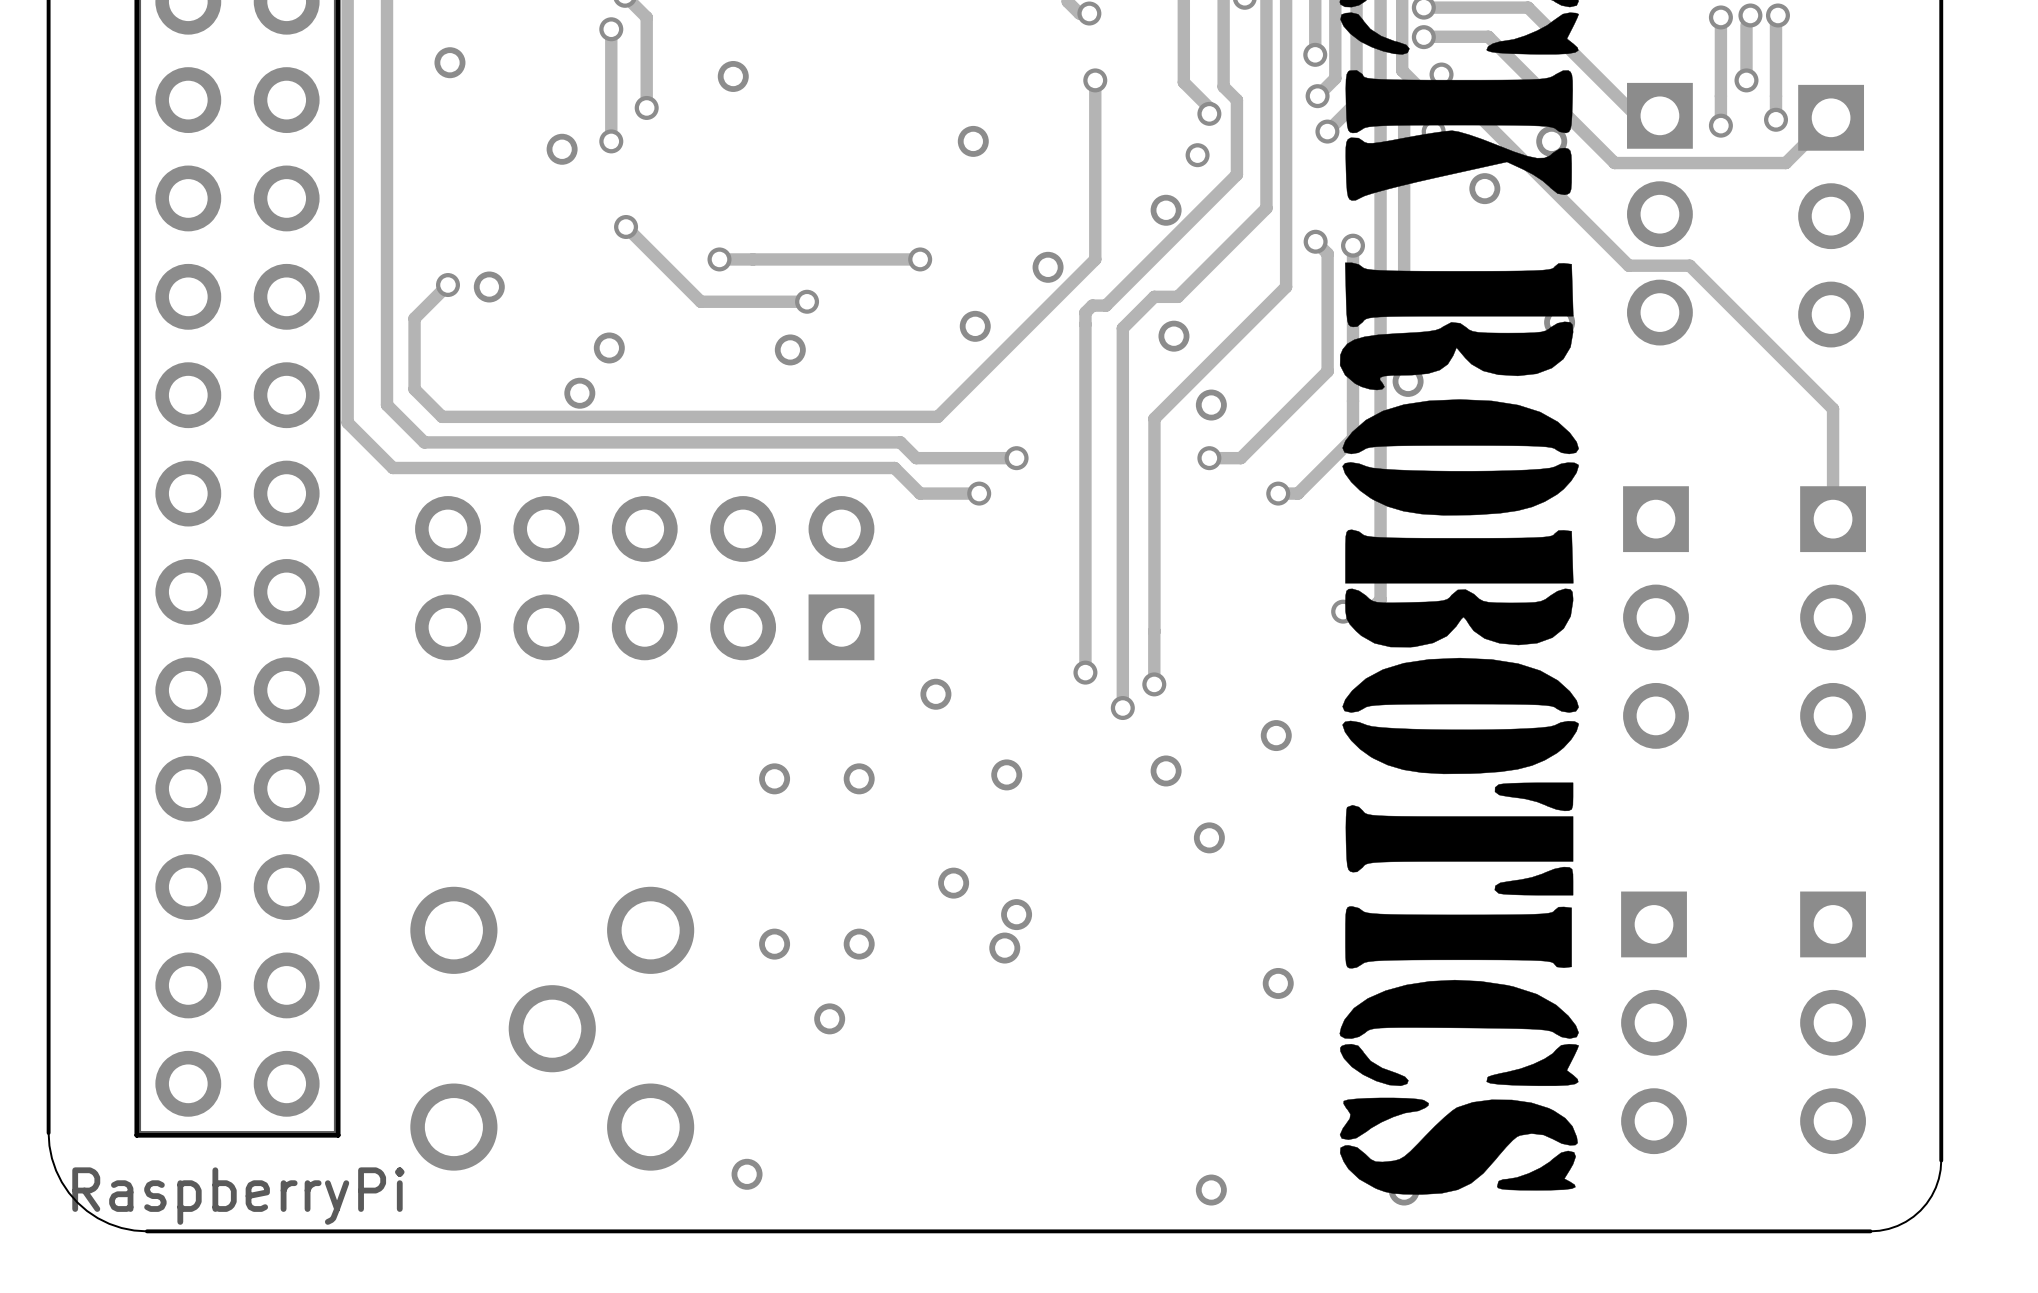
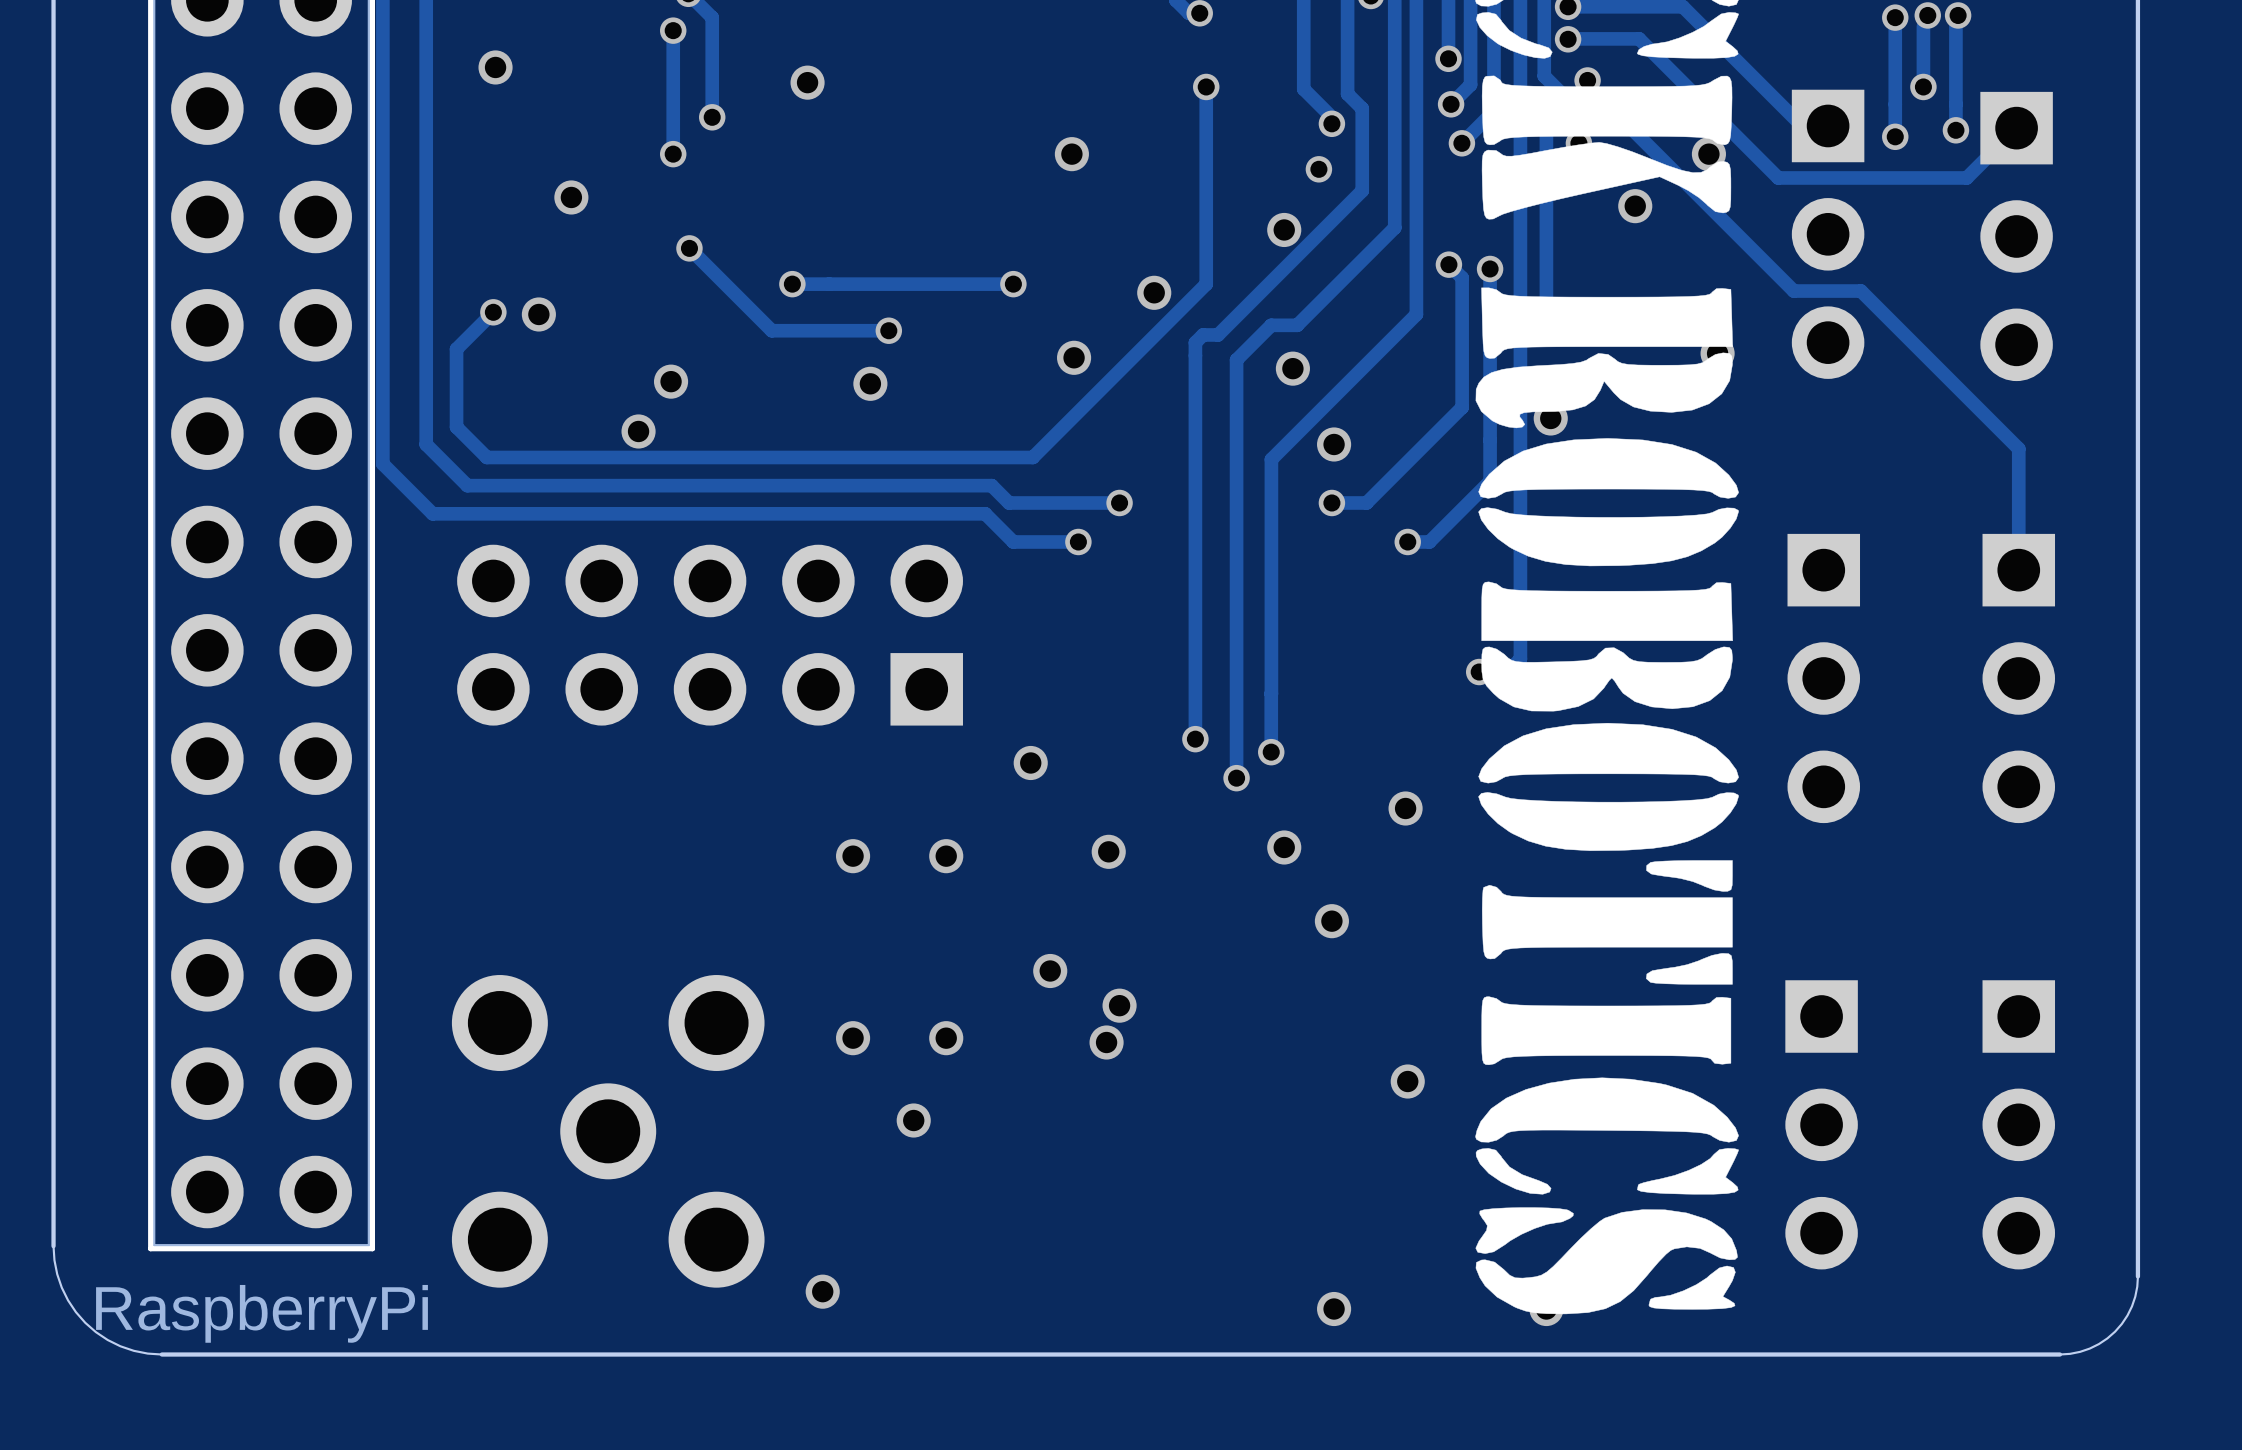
via position: (562, 149) -> (571, 197)

